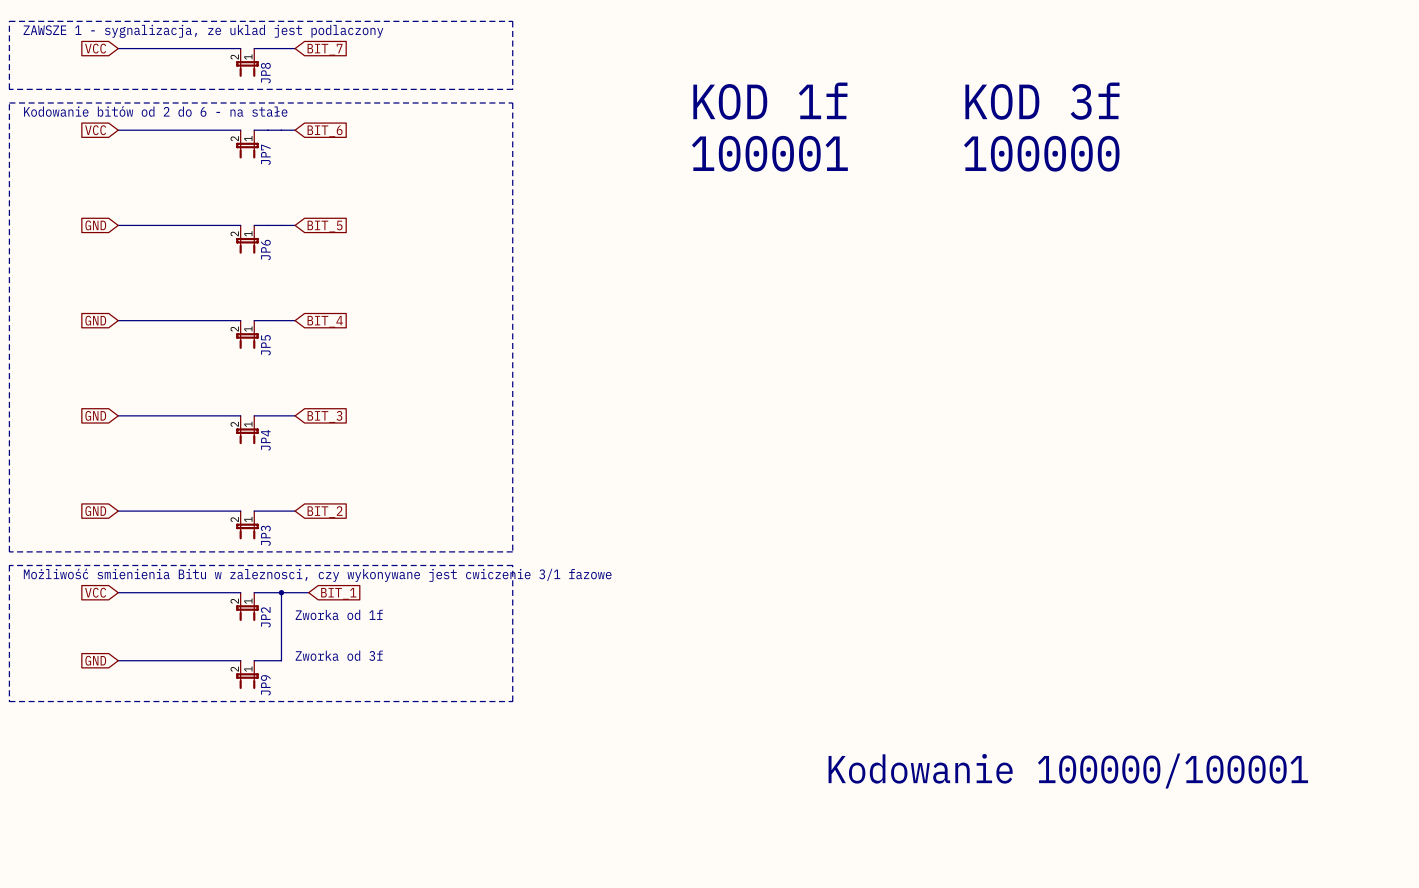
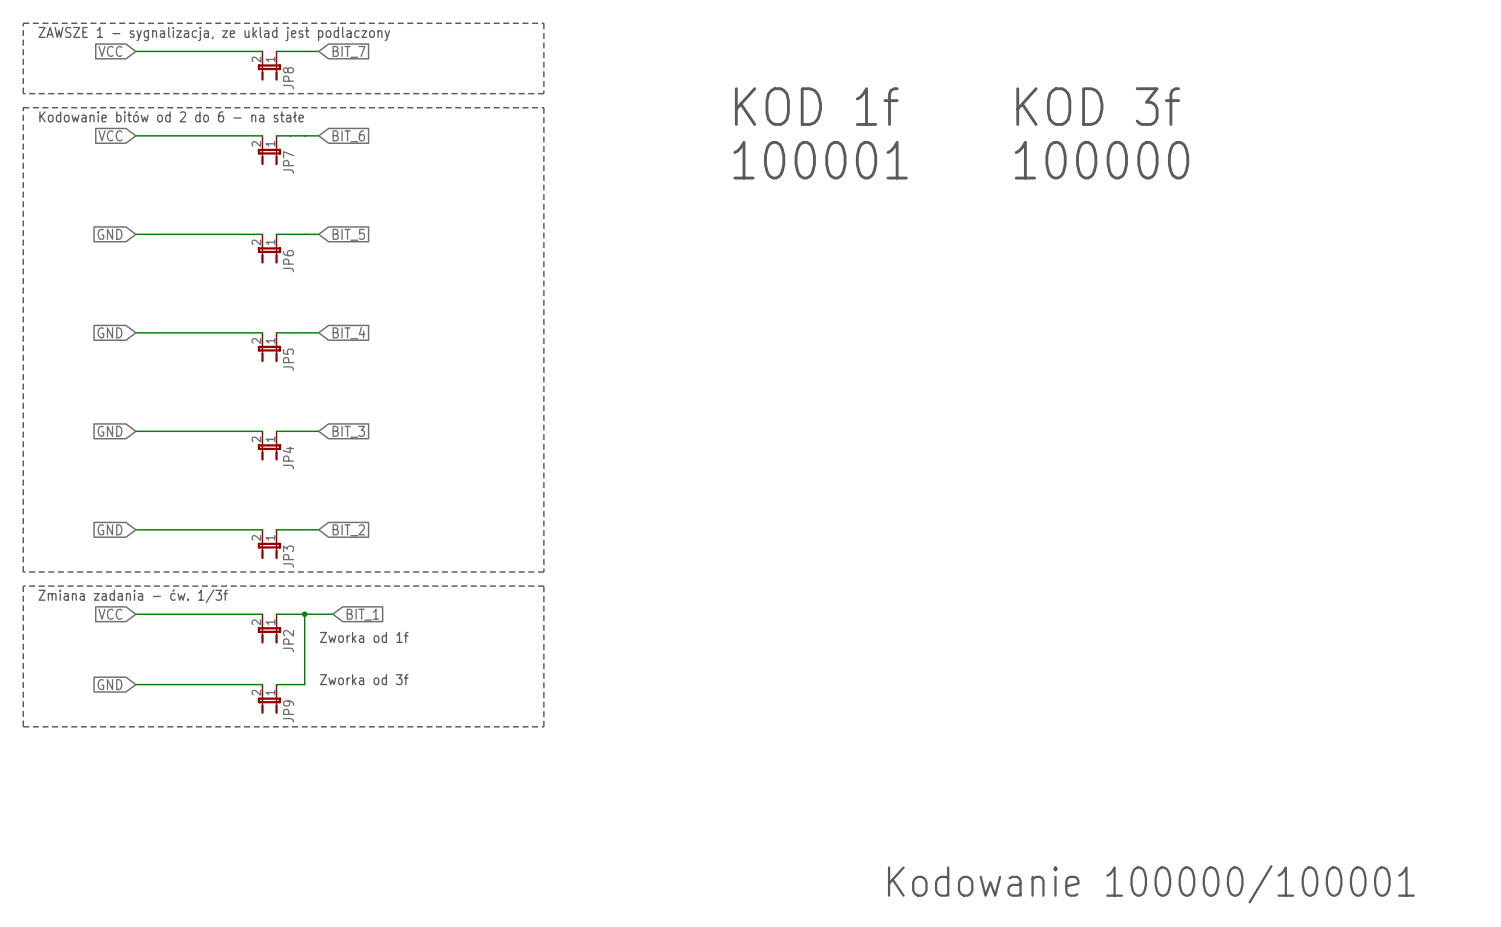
text: Możliwość smienienia Bitu w zaleznosci, czy wykonywane jest cwiczenie 3/1 fazowe (317, 575) -> Zmiana zadania - ćw. 1/3f (133, 596)
text position: Kodowanie 100000/100001 (1068, 771) -> Kodowanie 100000/100001 (1151, 884)

